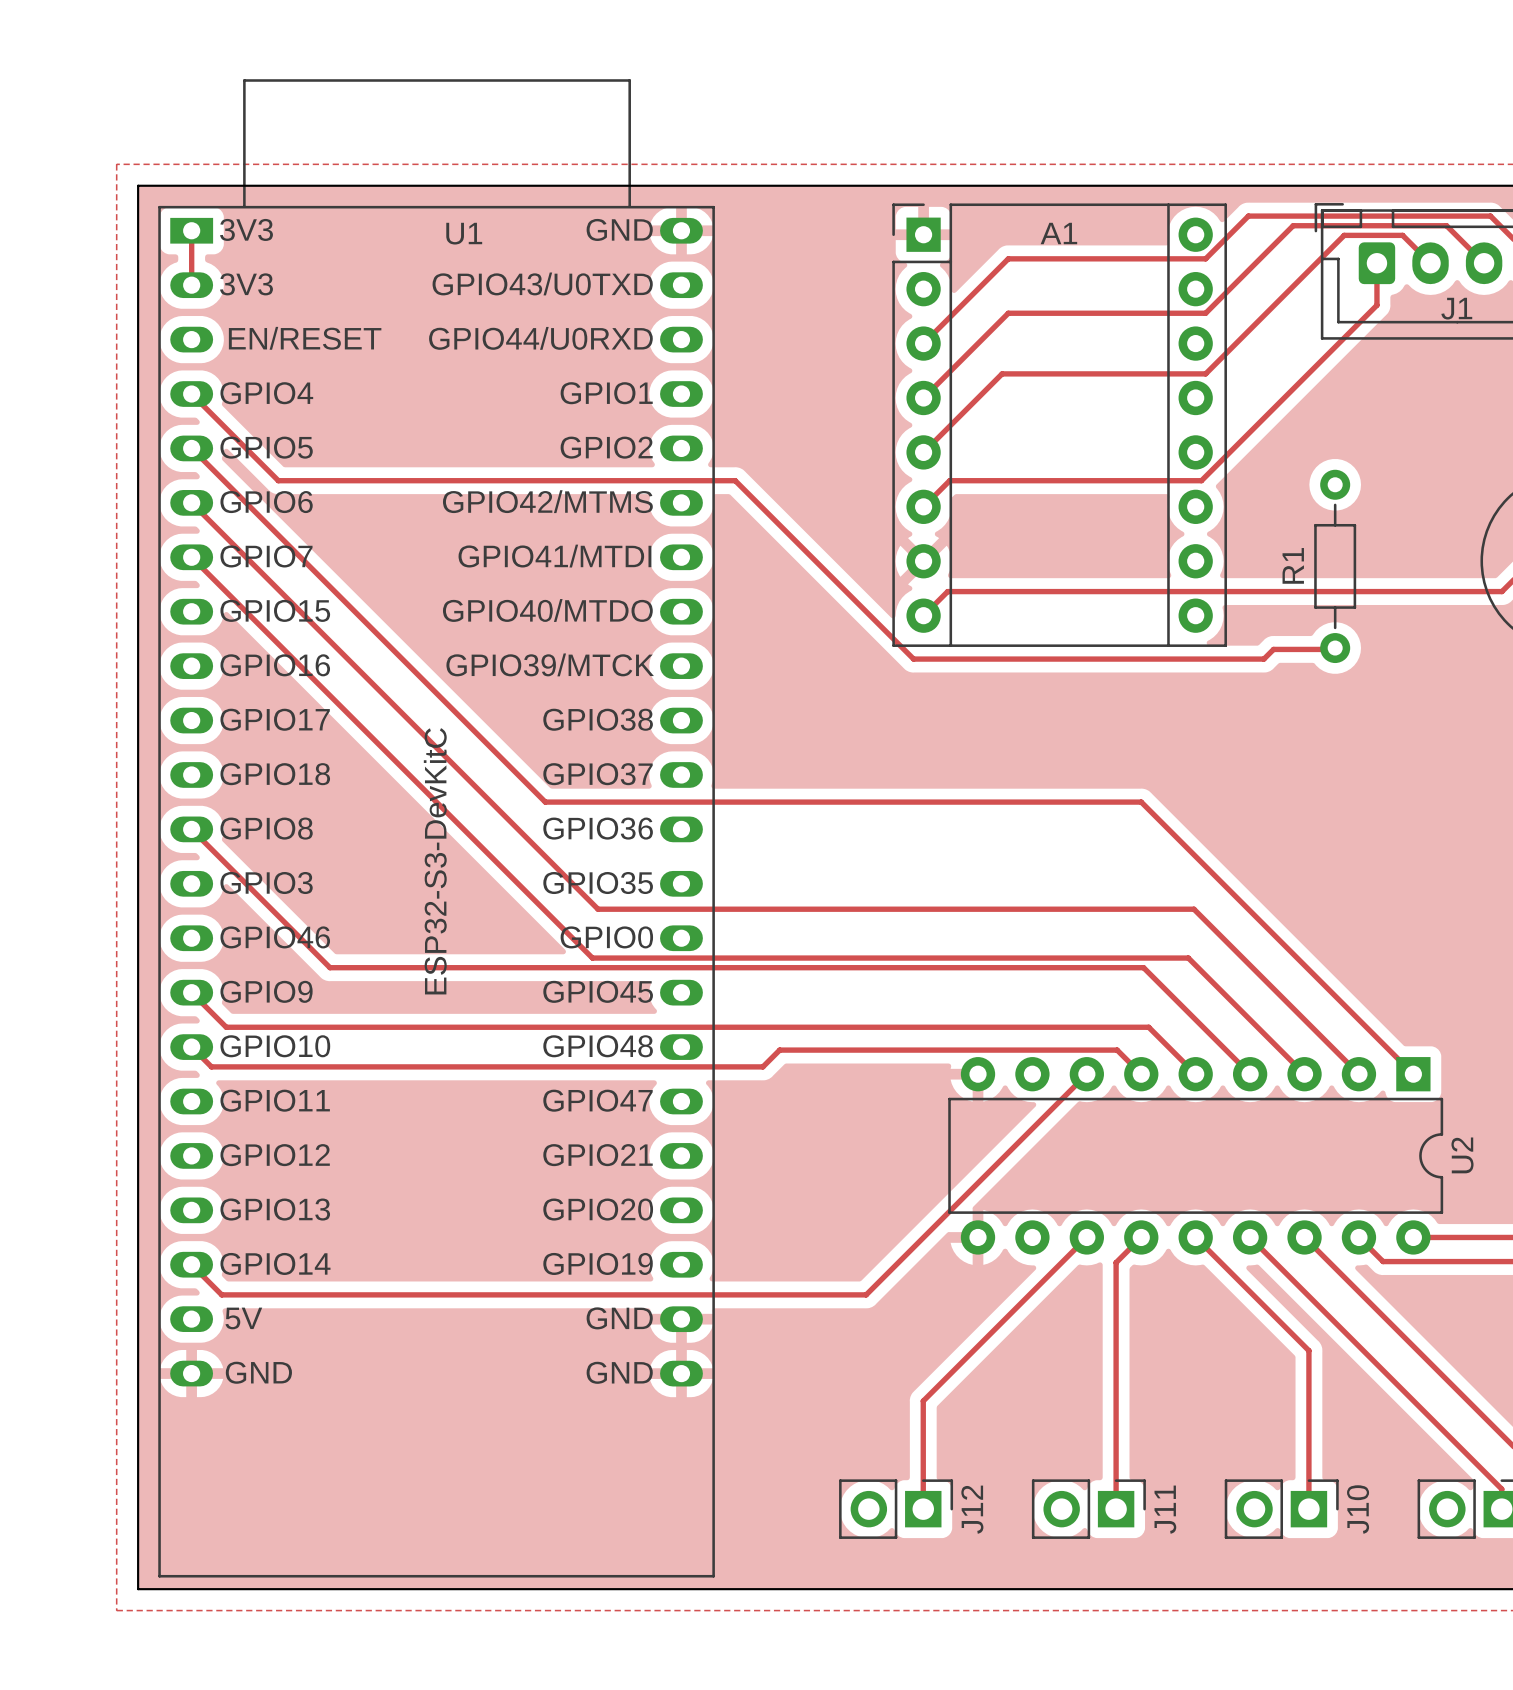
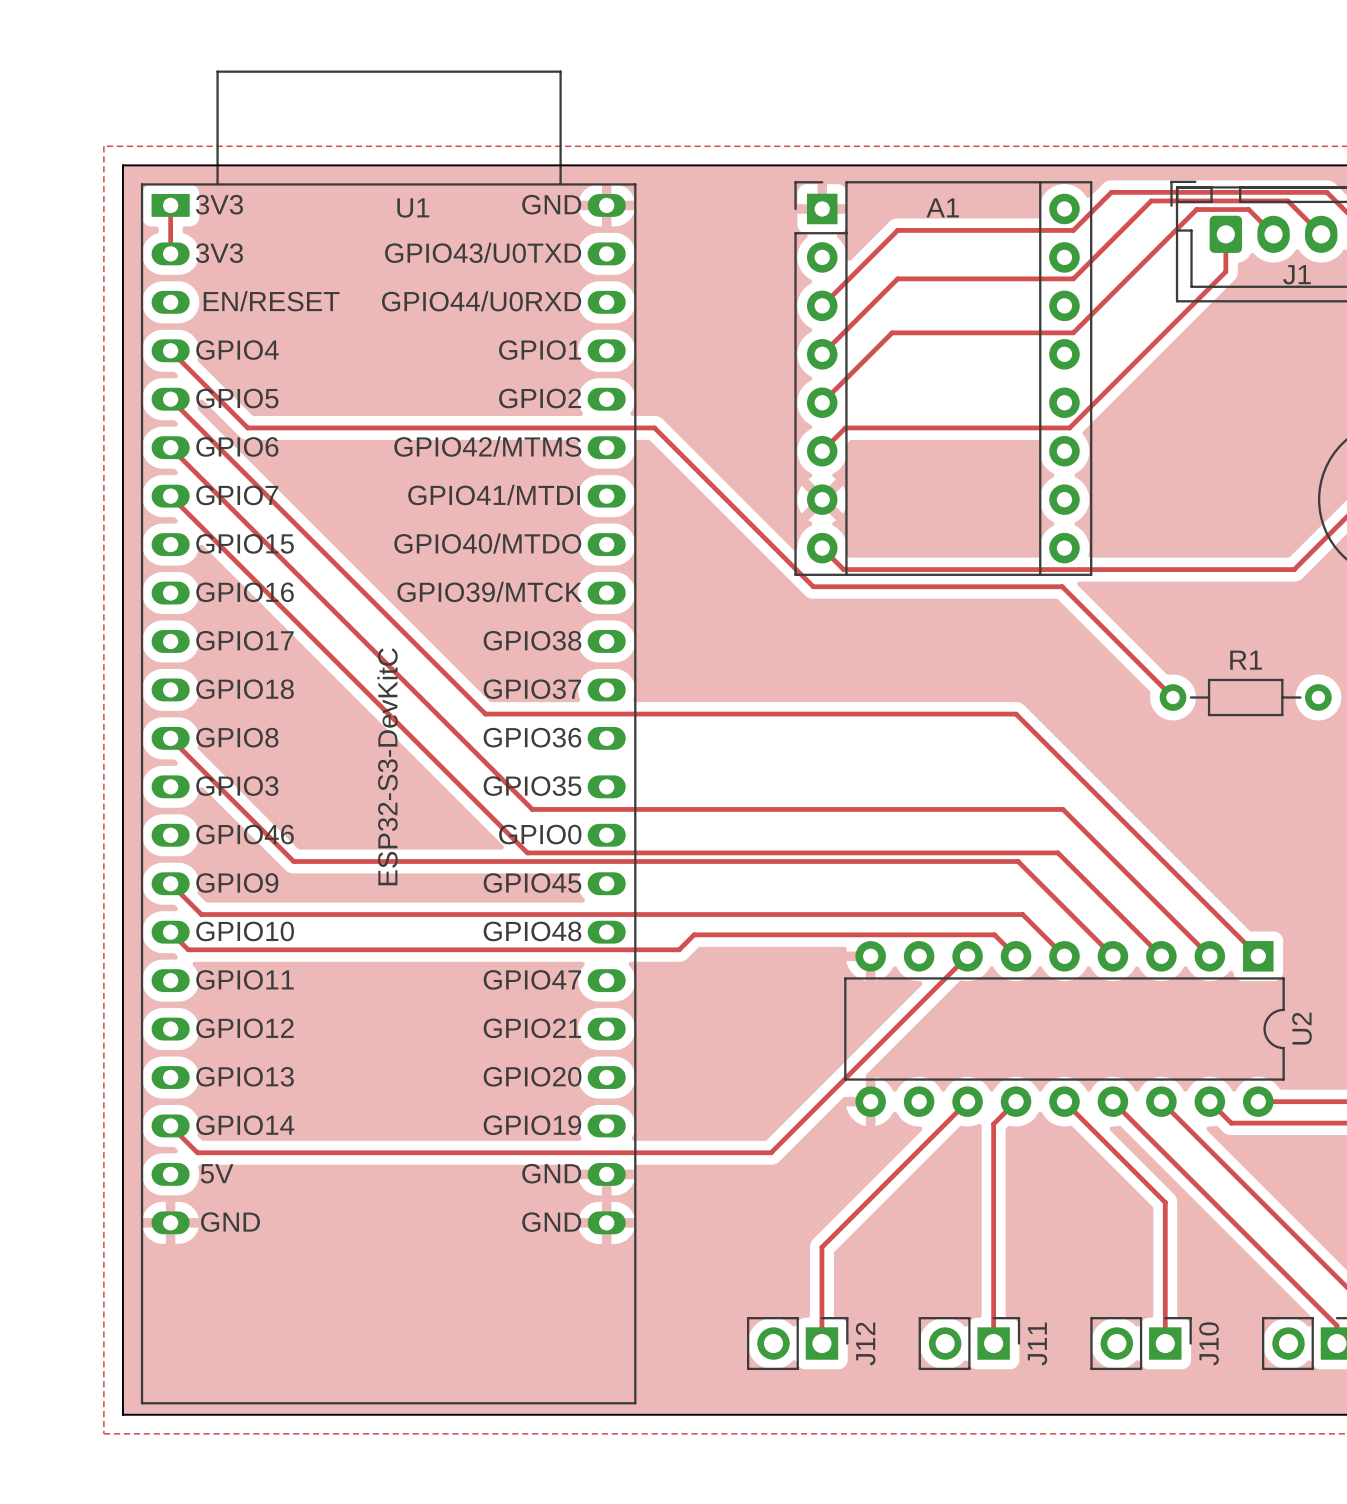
R1 rotation: 0° (1335, 566) -> 90° clockwise (1245, 697)
R1 position: (1335, 566) -> (1245, 697)
track: (1501, 591) (947, 591) (923, 615) -> (1337, 526) (1294, 569) (843, 569) (822, 548)
track: (1335, 649) (1273, 649) (1263, 659) (1193, 659) -> (1173, 697) (1062, 586)

